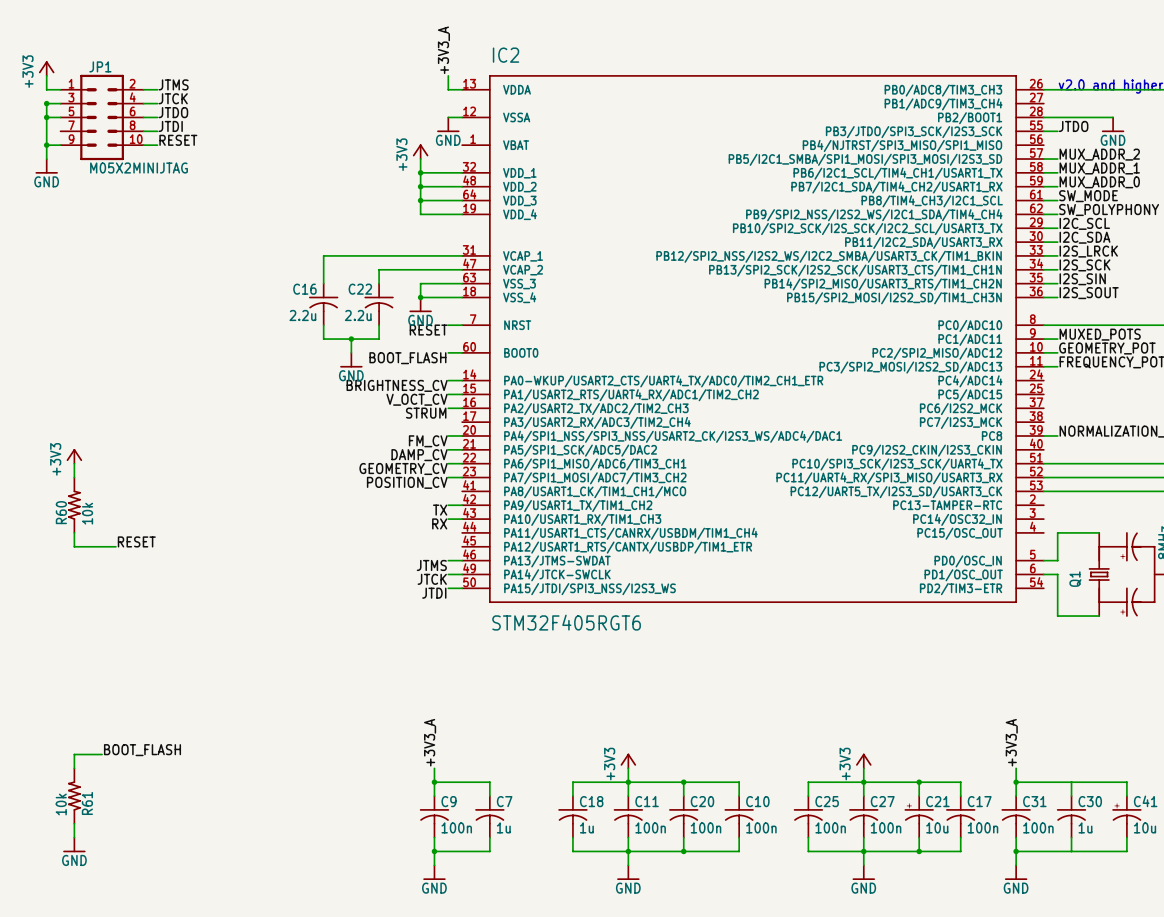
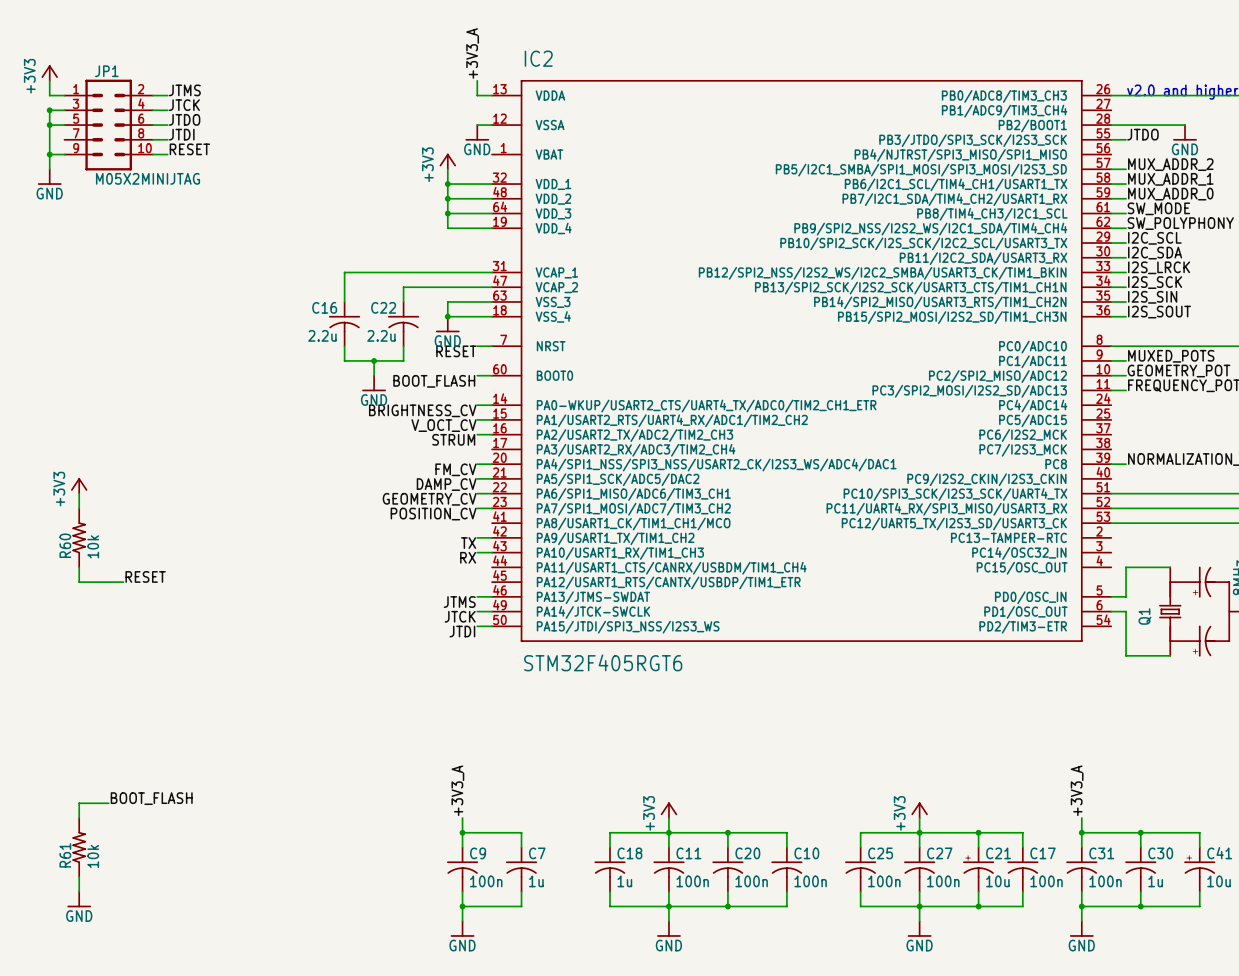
junction: none -> (1140, 832)
R61 flip: as is (74, 796) -> left-right (79, 847)
junction: none -> (1140, 906)

